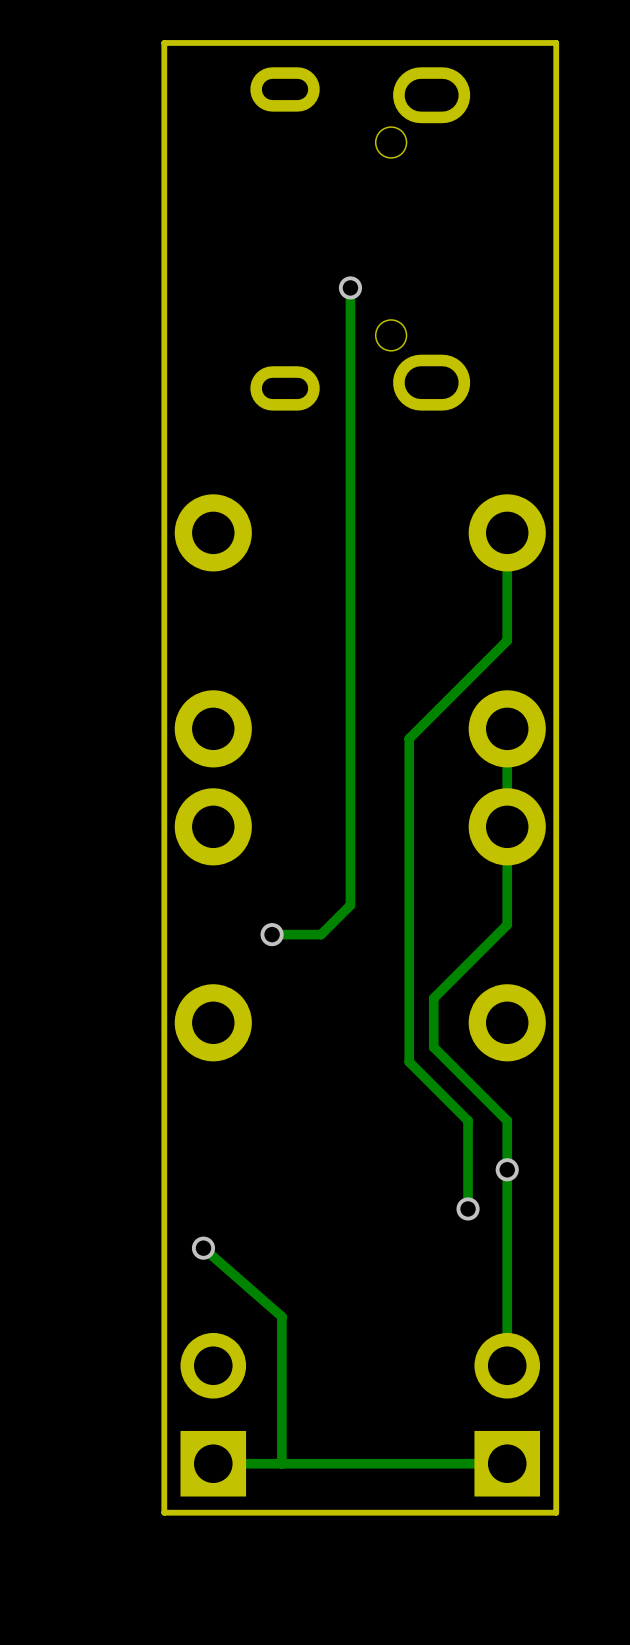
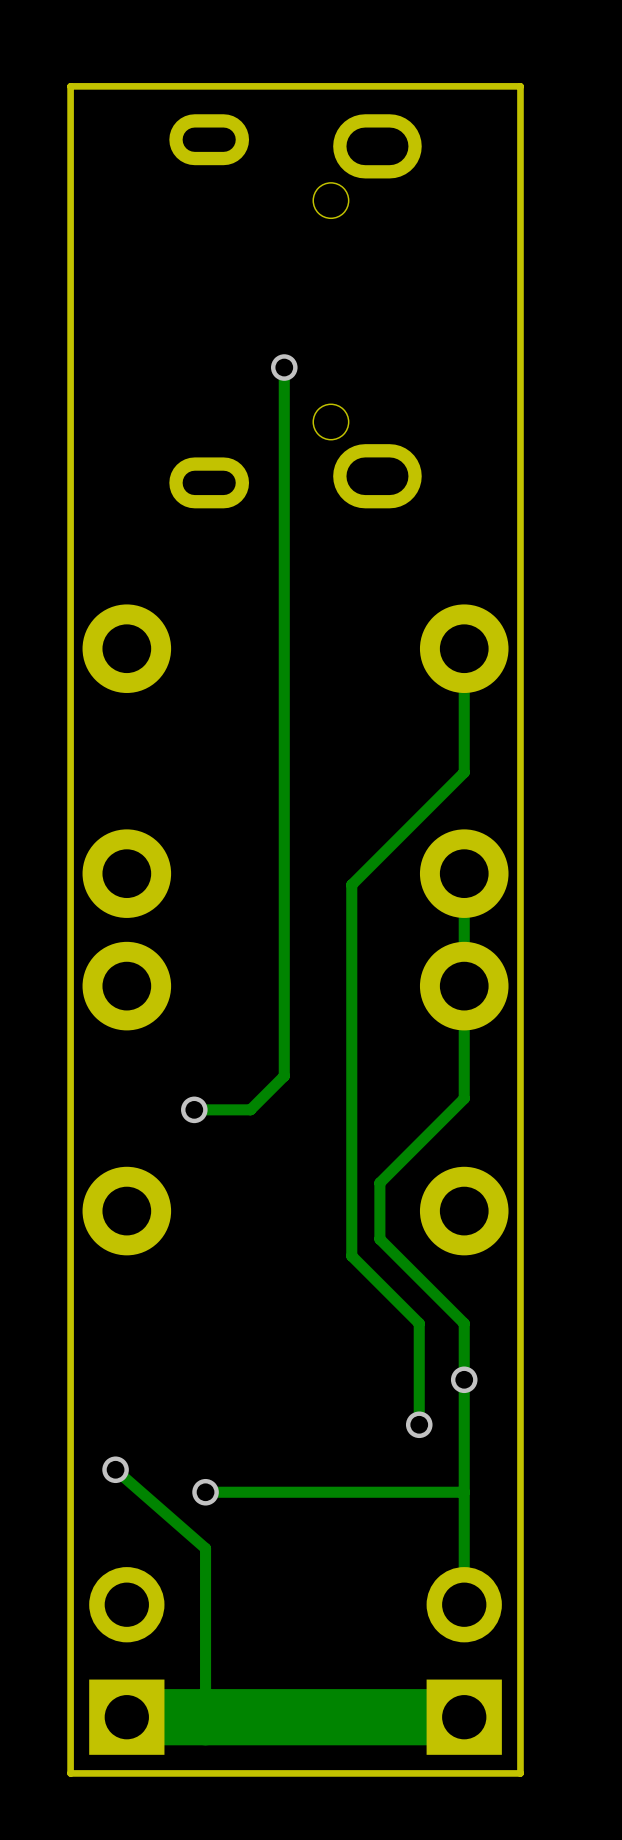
via: none -> (205, 1492)
track: none -> (464, 1492) (205, 1492)
track width: thin (507, 1463) (213, 1463) -> thick (464, 1717) (126, 1717)

